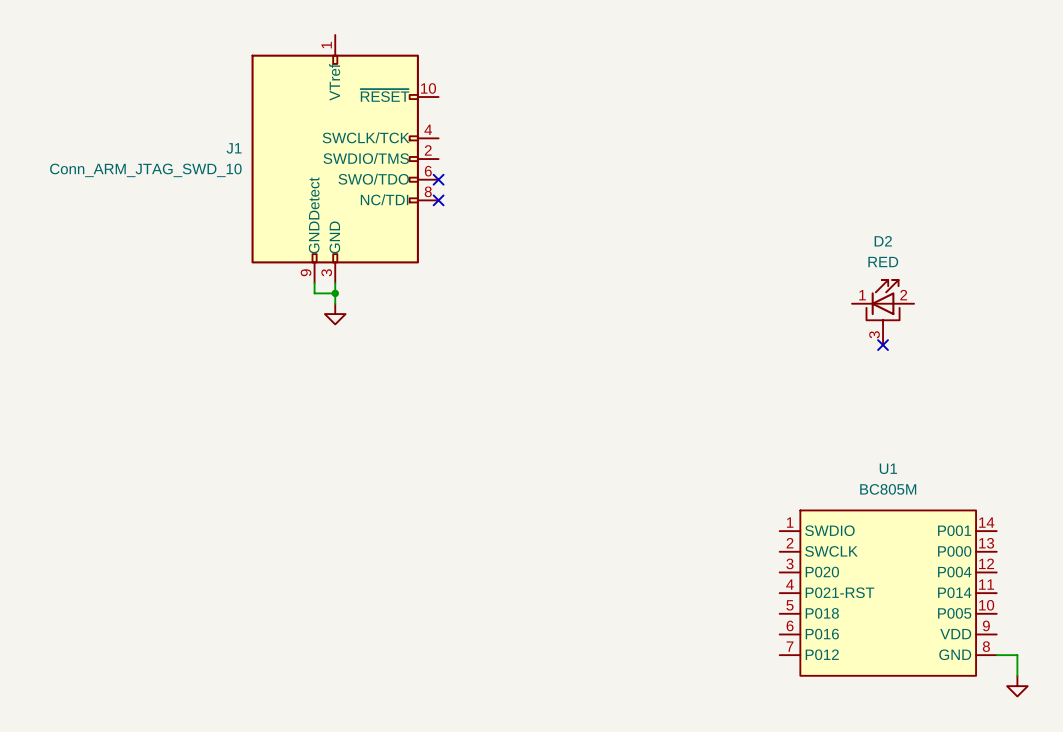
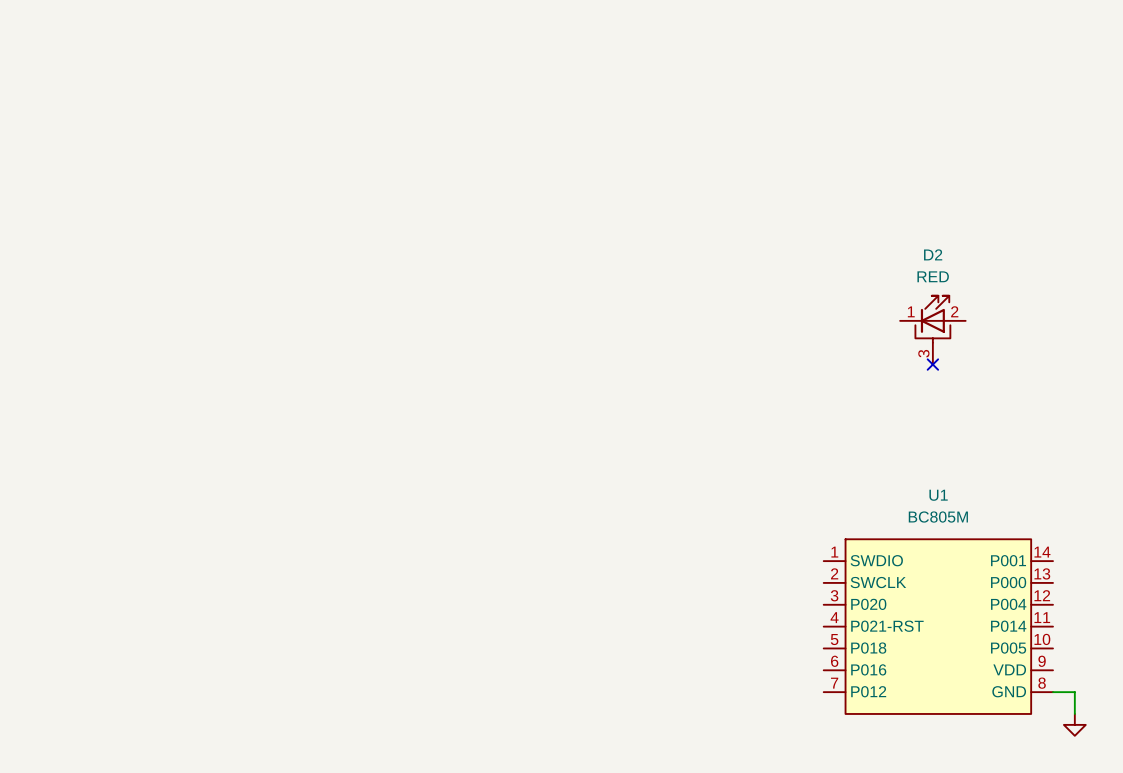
J1: Conn_ARM_JTAG_SWD_10 (345, 159) -> none
no-connect mark: (438, 179) -> none
no-connect mark: (438, 200) -> none
wire: (314, 283) (314, 293) (335, 293) -> none
wire: (335, 283) (335, 303) -> none
junction: (335, 293) -> none
power symbol: (335, 314) -> none

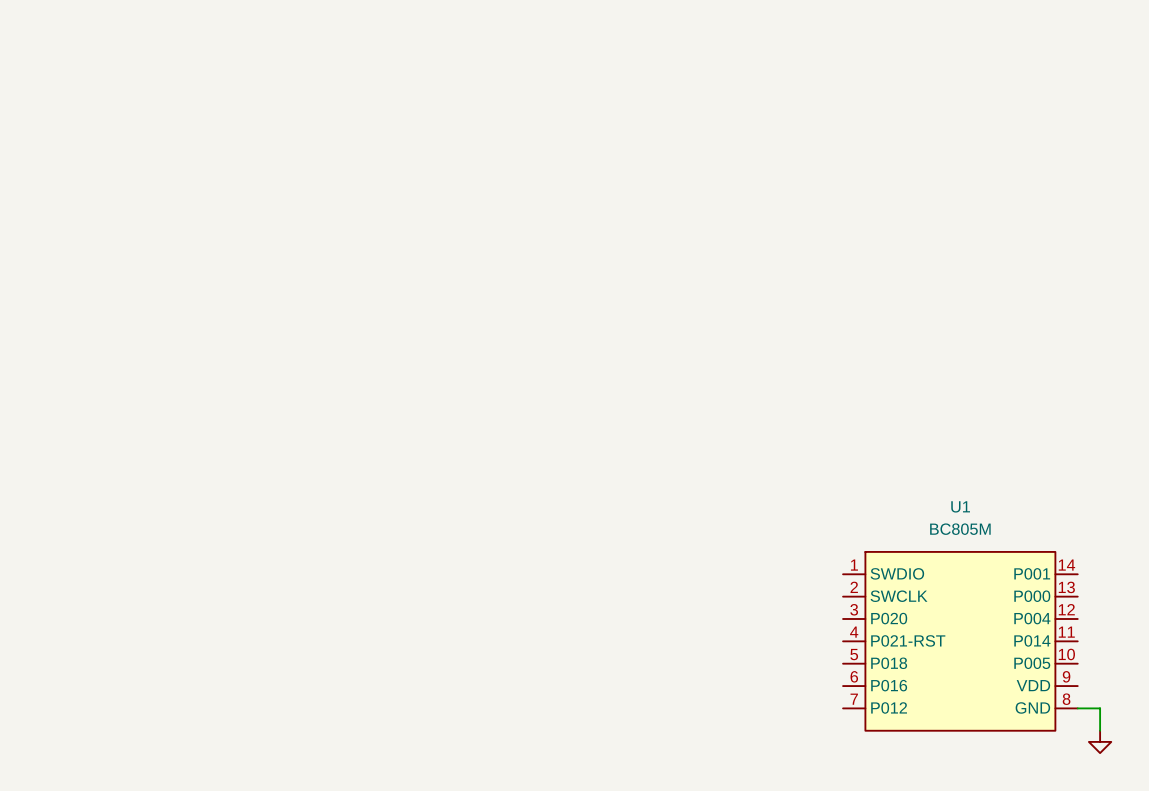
D2: RED (932, 330) -> none
no-connect mark: (932, 364) -> none

